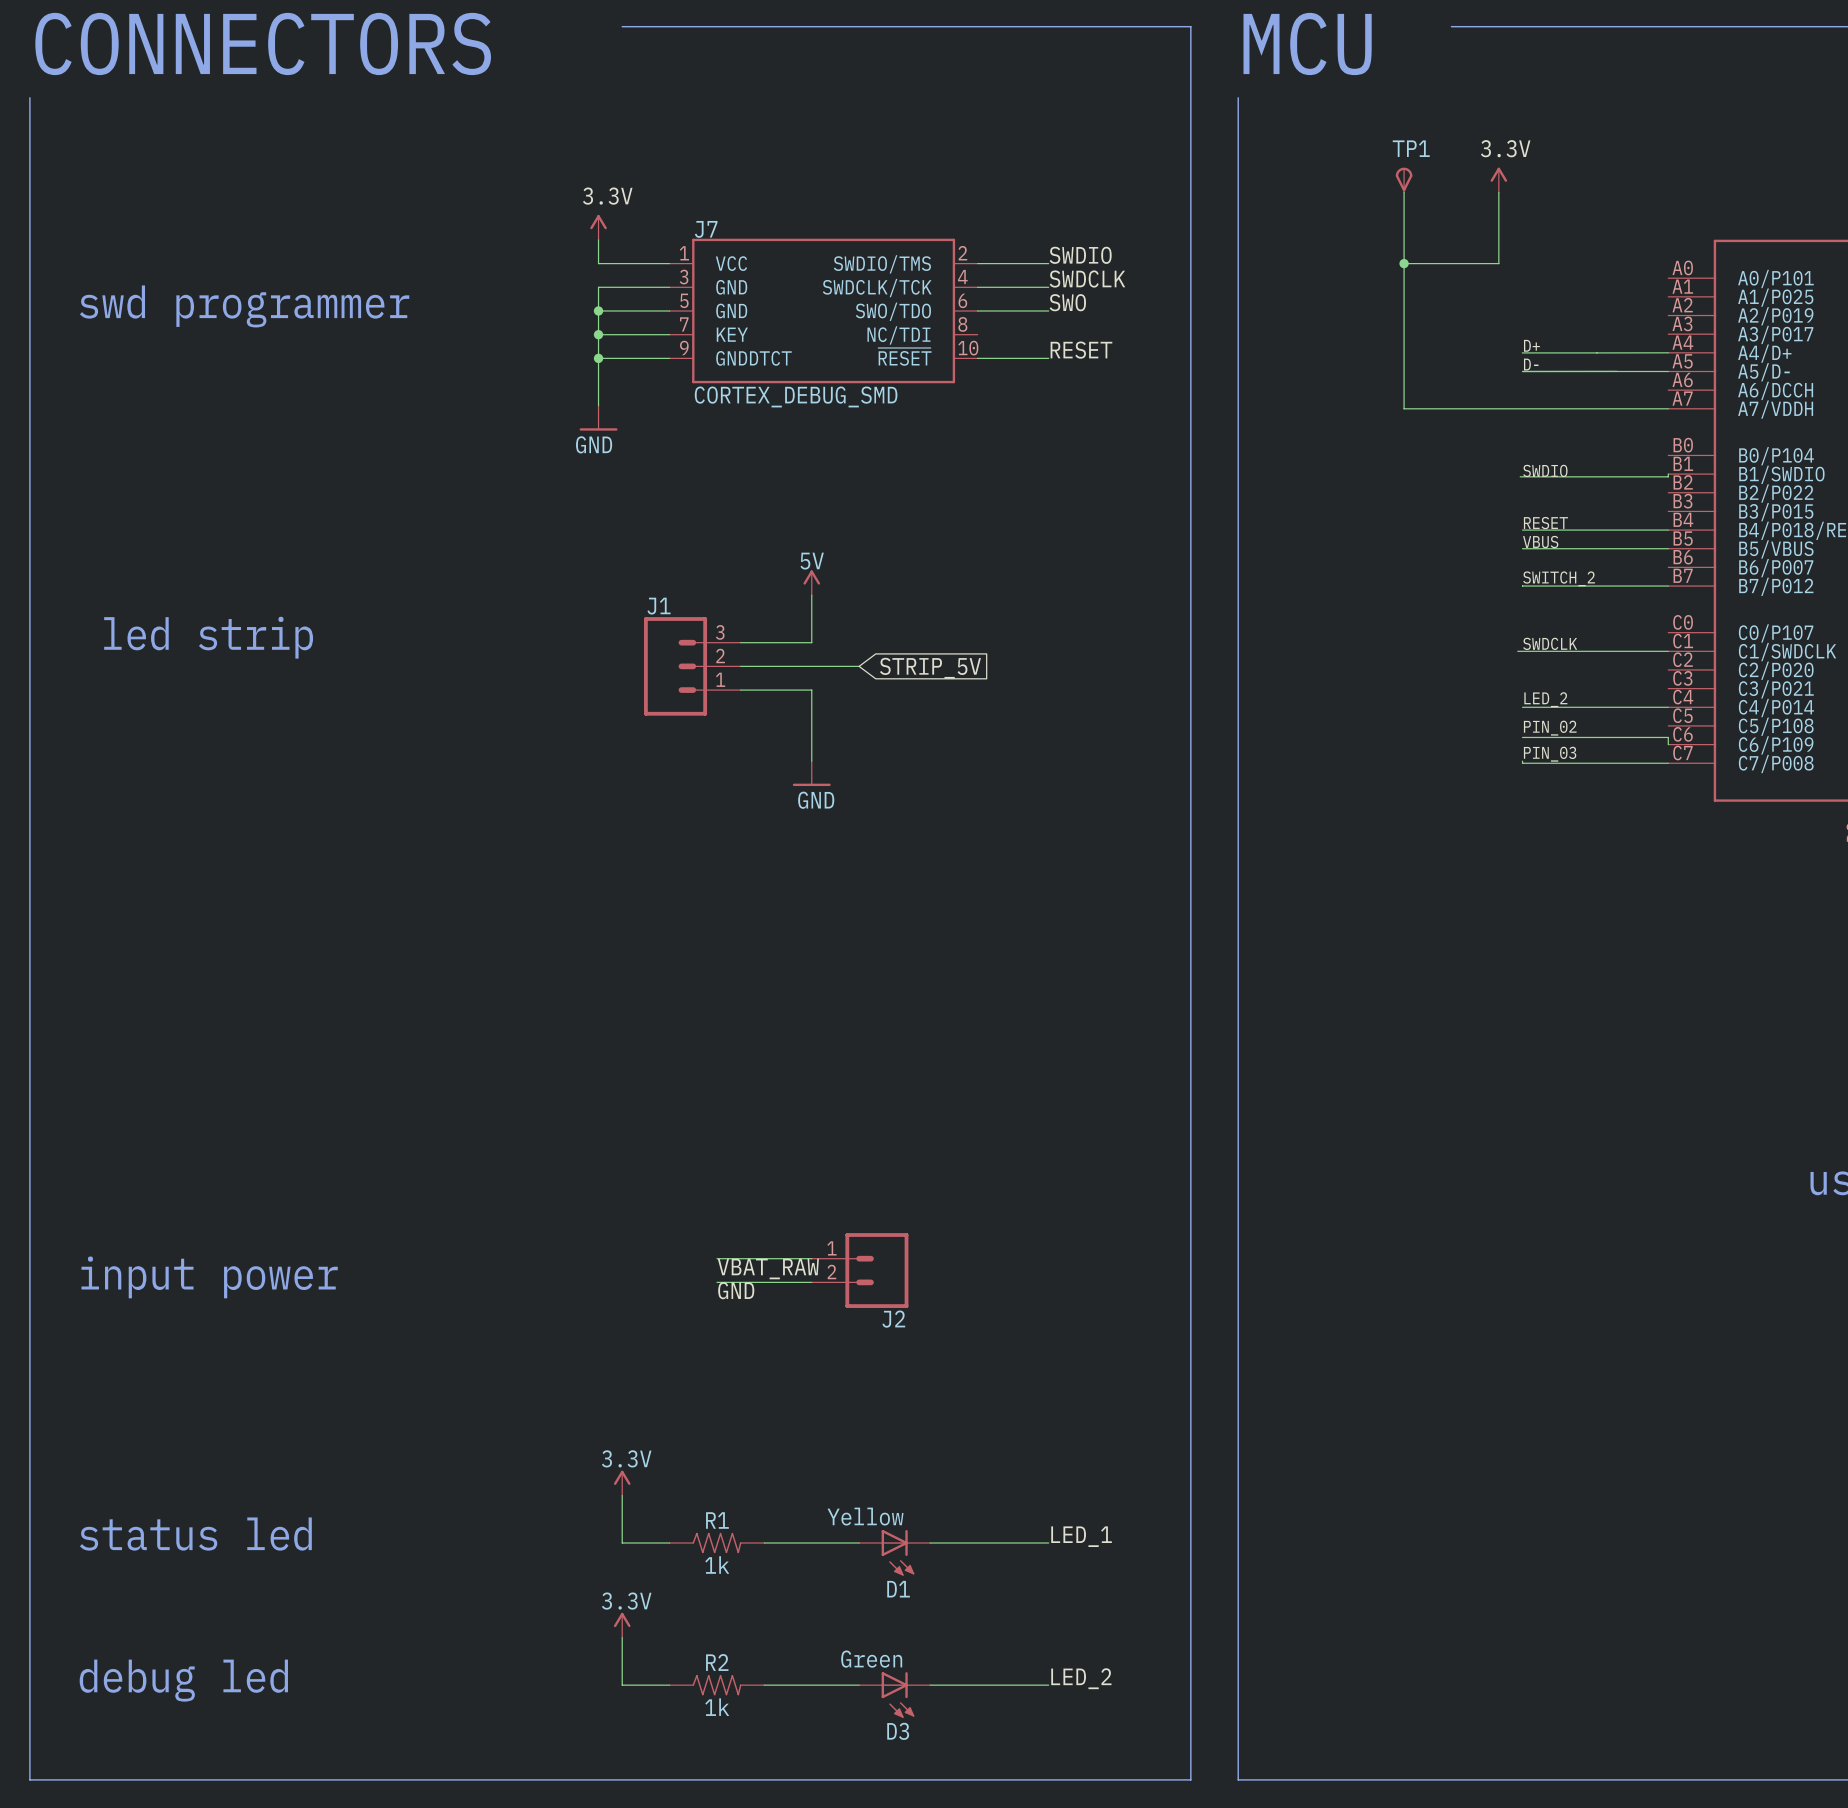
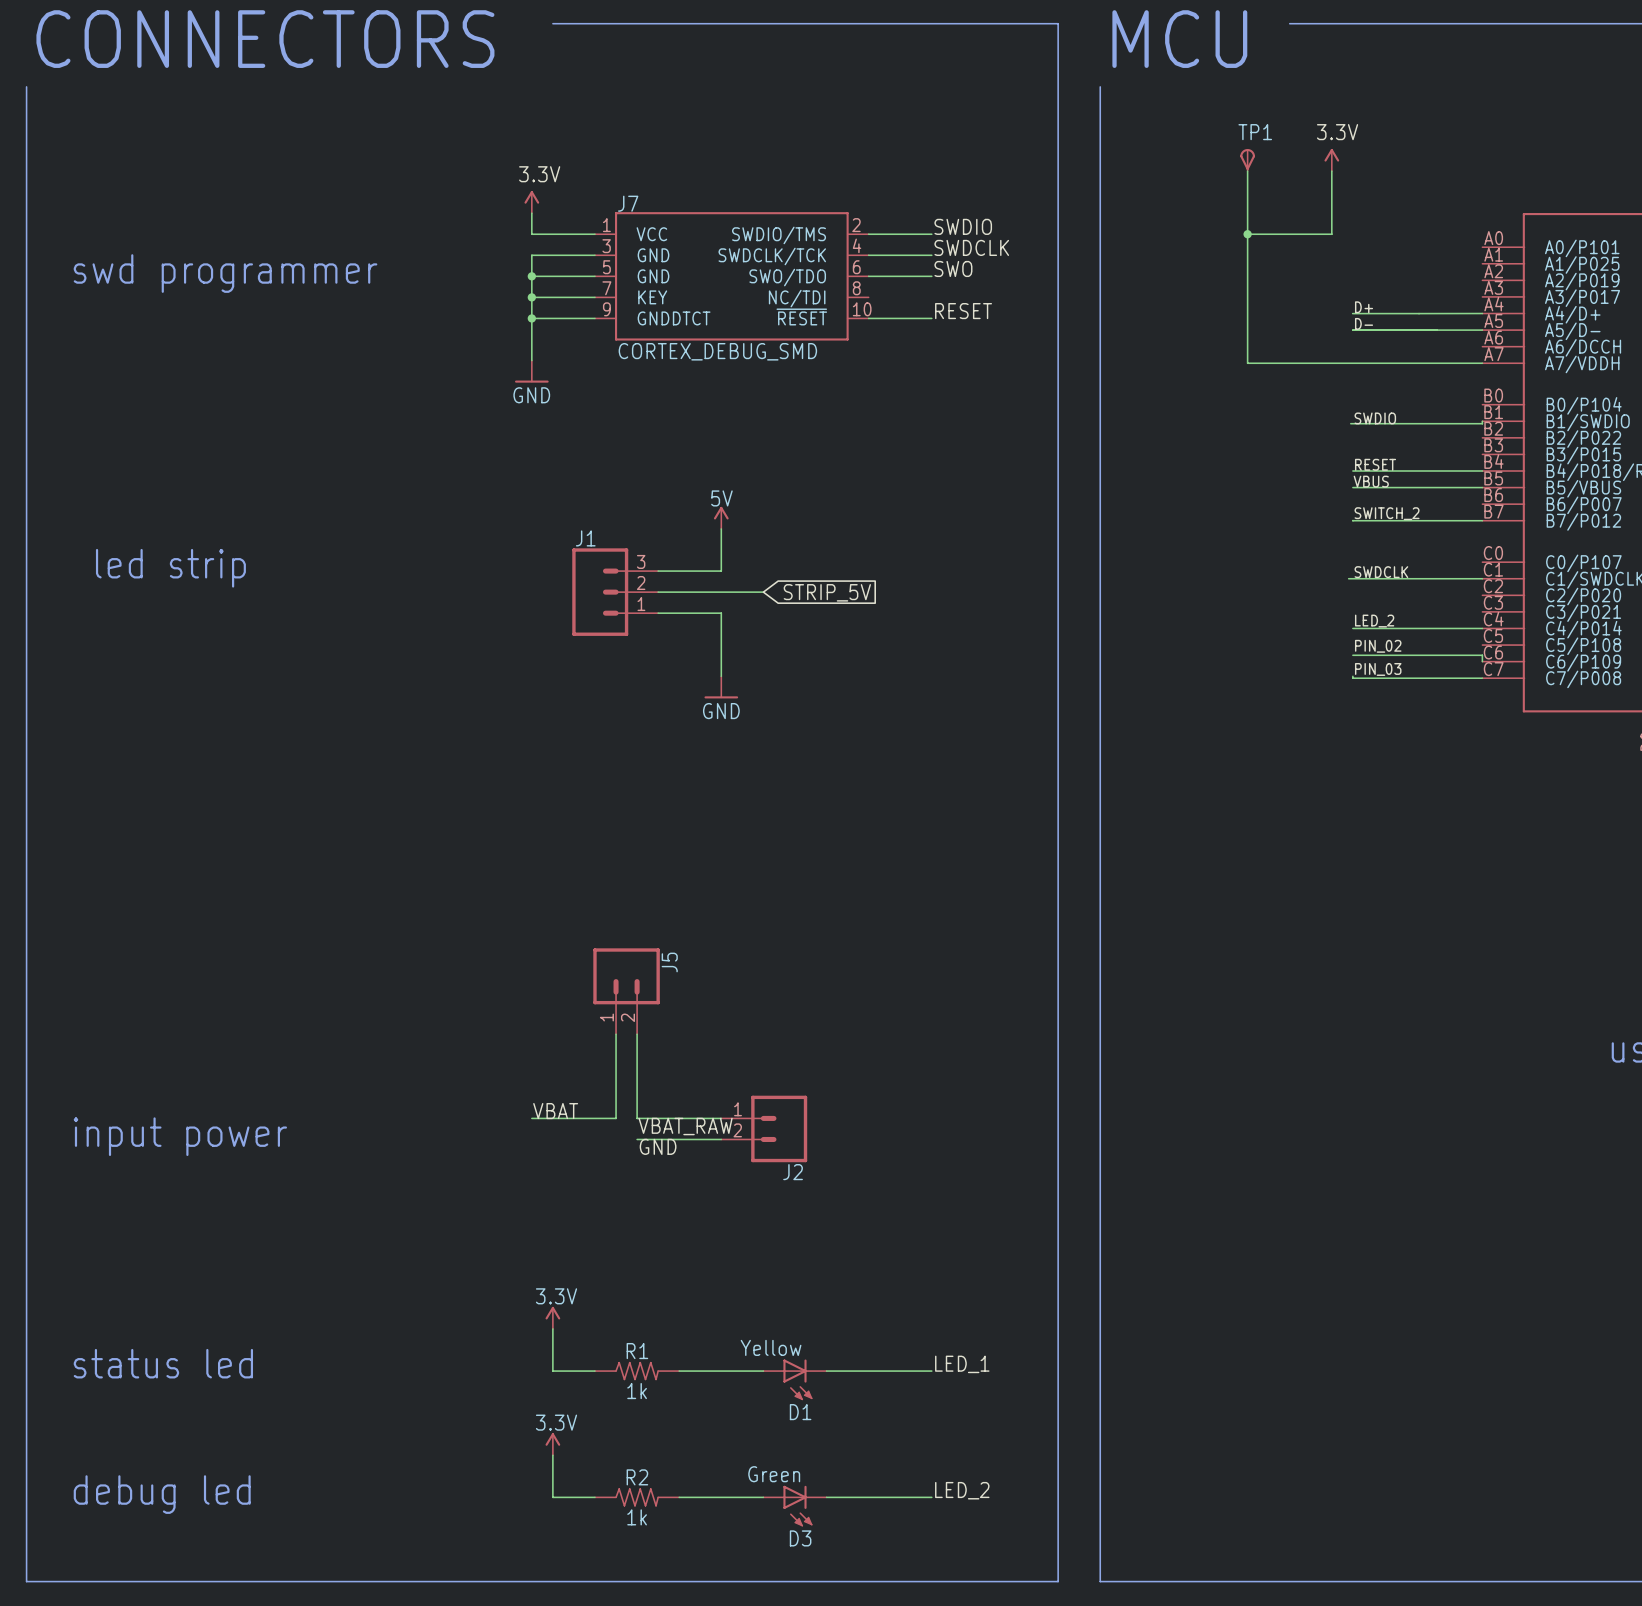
J5: none -> (626, 991)
wire: none -> (616, 1034) (616, 1118) (531, 1118)
wire: none -> (637, 1034) (637, 1118)
label: none -> VBAT (555, 1111)

